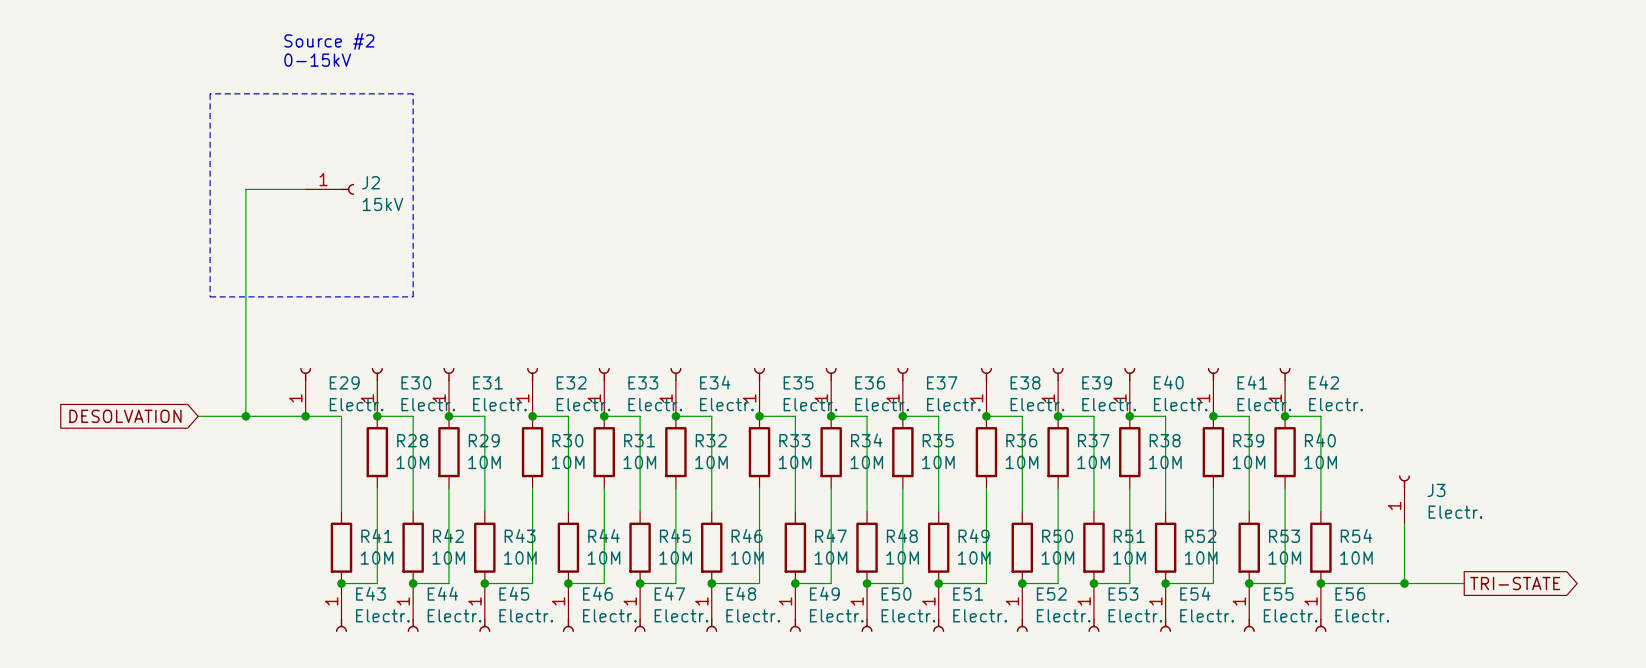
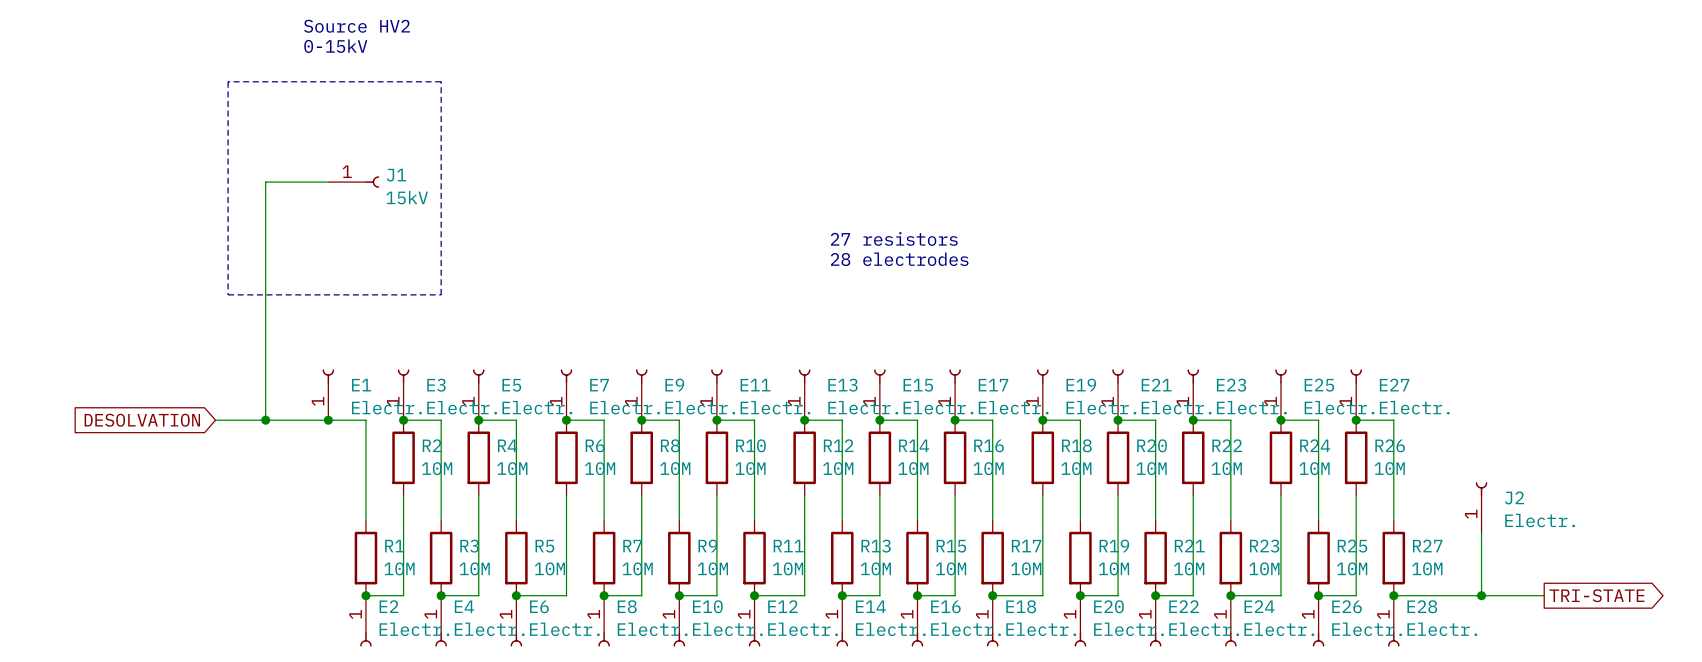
text: Source #2 (329, 41) -> Source HV2 (357, 26)
J2 name: J2 (371, 182) -> J1 (396, 175)
text: none -> 27 resistors (894, 239)
text: none -> 28 electrodes (899, 259)
E29 name: E29 (344, 382) -> E1 (361, 385)
E30 name: E30 (416, 382) -> E3 (436, 385)
E31 name: E31 (488, 382) -> E5 (511, 385)
E32 name: E32 (571, 382) -> E7 (599, 385)
E33 name: E33 (643, 382) -> E9 (674, 385)
E34 name: E34 (715, 382) -> E11 (755, 385)
E35 name: E35 (798, 382) -> E13 (842, 385)
E36 name: E36 (870, 382) -> E15 (918, 385)
E37 name: E37 (942, 382) -> E17 (993, 385)
E38 name: E38 (1025, 382) -> E19 (1081, 385)
E39 name: E39 (1097, 382) -> E21 (1156, 385)
E40 name: E40 (1168, 382) -> E23 (1231, 385)
E41 name: E41 (1252, 382) -> E25 (1319, 385)
E42 name: E42 (1324, 382) -> E27 (1394, 385)
R28 name: R28 (412, 440) -> R2 (432, 445)
R29 name: R29 (484, 440) -> R4 (507, 445)
R30 name: R30 (567, 440) -> R6 (595, 445)
R31 name: R31 (639, 440) -> R8 (670, 445)
R32 name: R32 (711, 440) -> R10 (750, 445)
R33 name: R33 (794, 440) -> R12 (838, 445)
R34 name: R34 (866, 440) -> R14 (914, 445)
R35 name: R35 (938, 440) -> R16 (989, 445)
R36 name: R36 (1021, 440) -> R18 (1076, 445)
R37 name: R37 (1093, 440) -> R20 (1152, 445)
R38 name: R38 (1165, 440) -> R22 (1227, 445)
R39 name: R39 (1248, 440) -> R24 (1315, 445)
R40 name: R40 (1320, 440) -> R26 (1390, 445)
J3 name: J3 (1436, 490) -> J2 (1514, 497)
R41 name: R41 (376, 535) -> R1 (394, 546)
R42 name: R42 (448, 535) -> R3 (469, 546)
R43 name: R43 (520, 535) -> R5 (544, 546)
R44 name: R44 (604, 535) -> R7 (632, 546)
R45 name: R45 (675, 535) -> R9 (707, 545)
R46 name: R46 (747, 535) -> R11 (788, 546)
R47 name: R47 (830, 535) -> R13 (876, 546)
R48 name: R48 (902, 535) -> R15 (951, 546)
R49 name: R49 (973, 535) -> R17 (1026, 546)
R54 name: R54 (1356, 535) -> R27 (1427, 545)
R50 name: R50 (1057, 536) -> R19 (1114, 545)
R51 name: R51 (1129, 536) -> R21 (1189, 545)
R52 name: R52 (1200, 536) -> R23 (1264, 546)
R53 name: R53 (1284, 536) -> R25 (1352, 546)
E43 name: E43 (370, 593) -> E2 (389, 606)
E44 name: E44 (442, 593) -> E4 (464, 606)
E45 name: E45 (514, 593) -> E6 (539, 606)
E46 name: E46 (597, 593) -> E8 (627, 606)
E47 name: E47 (669, 593) -> E10 (707, 606)
E48 name: E48 (741, 593) -> E12 (782, 606)
E49 name: E49 (824, 593) -> E14 (870, 606)
E54 name: E54 (1195, 593) -> E24 (1259, 606)
E50 name: E50 (896, 594) -> E16 (945, 606)
E51 name: E51 (968, 594) -> E18 (1021, 606)
E52 name: E52 (1051, 594) -> E20 (1108, 606)
E53 name: E53 (1123, 594) -> E22 (1184, 606)
E55 name: E55 (1278, 594) -> E26 (1347, 606)
E56 name: E56 (1350, 594) -> E28 (1422, 606)

